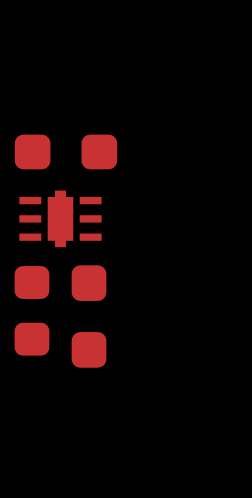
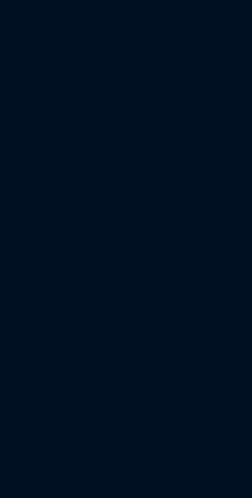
part: (65, 151) -> none
part: (60, 218) -> none
part: (31, 310) -> none
part: (89, 316) -> none

